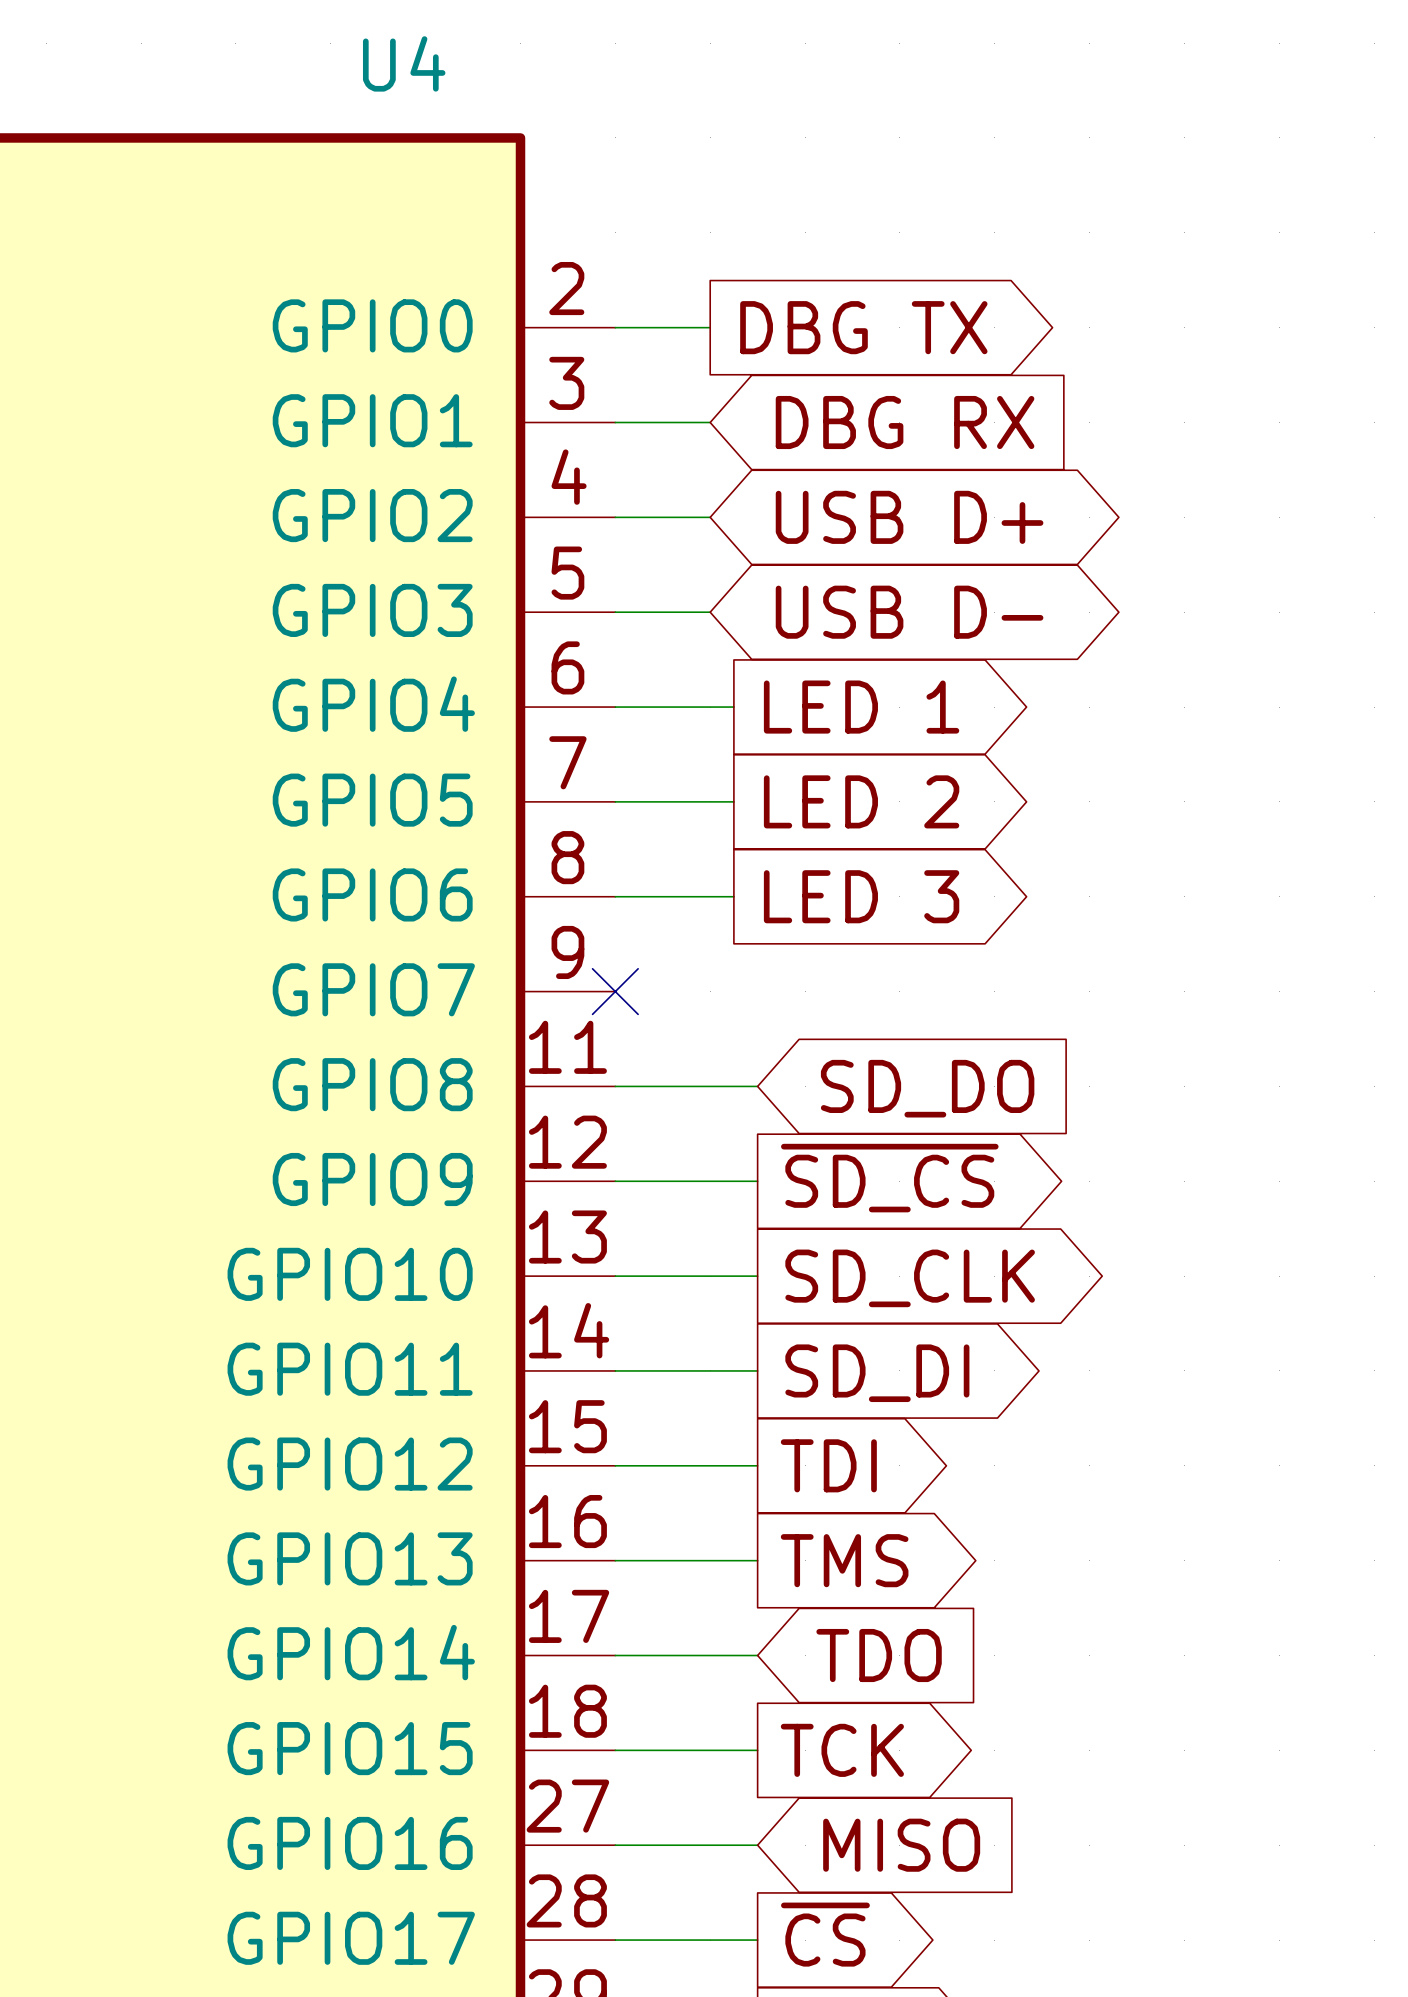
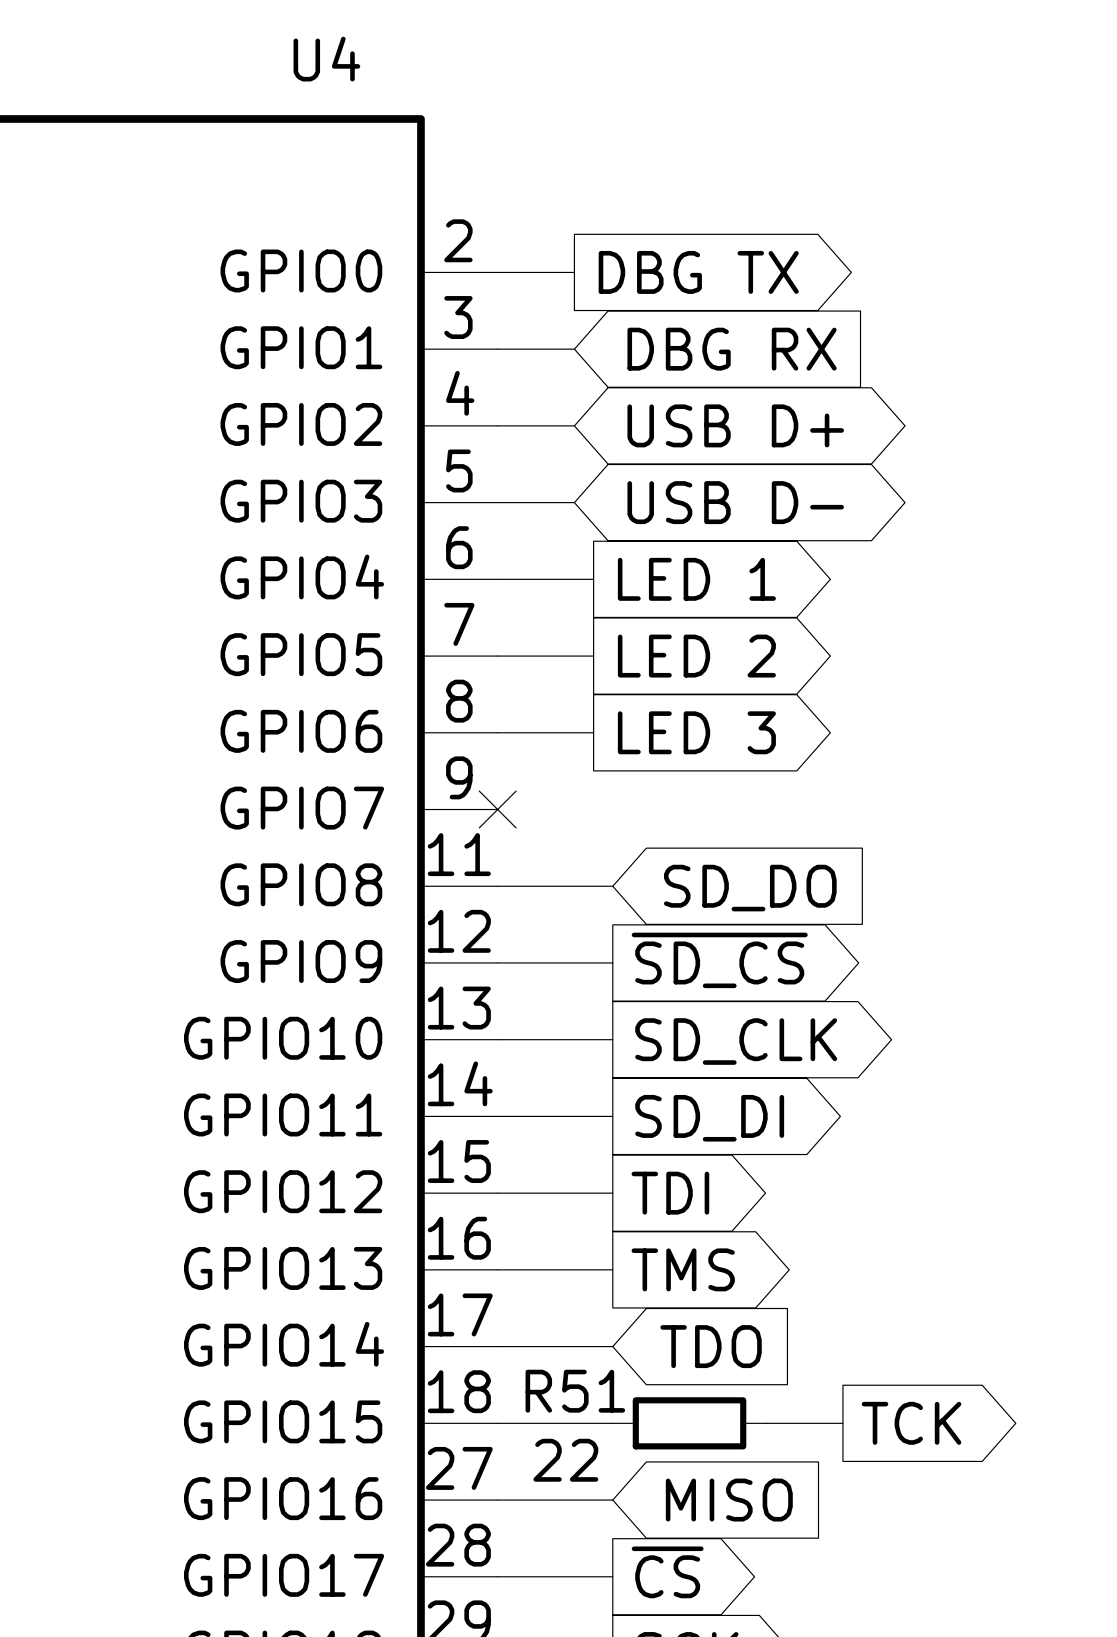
global label position: TCK (842, 1750) -> TCK (911, 1423)
R51: none -> 22 (689, 1423)
wire: none -> (766, 1423) (842, 1423)

